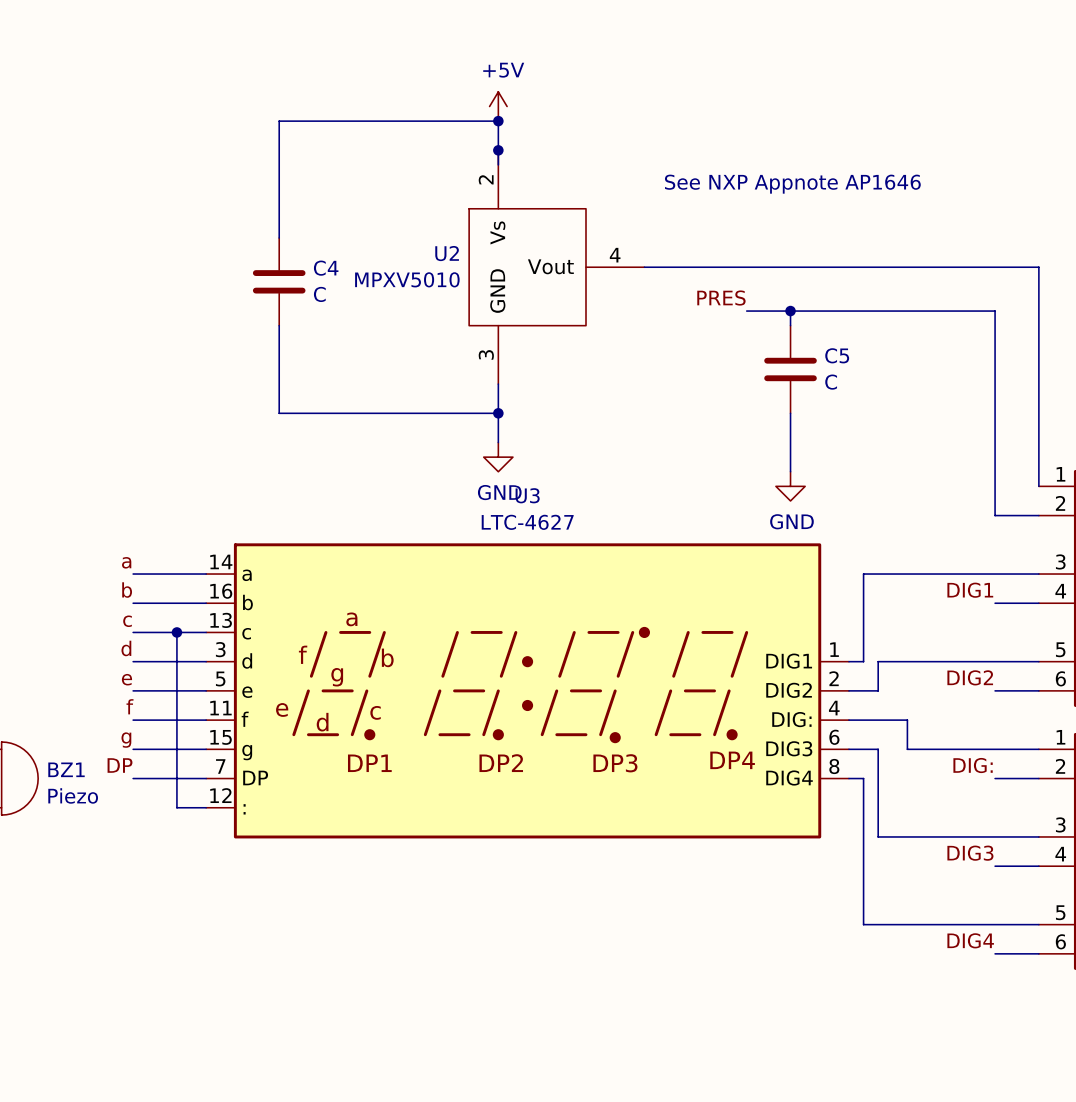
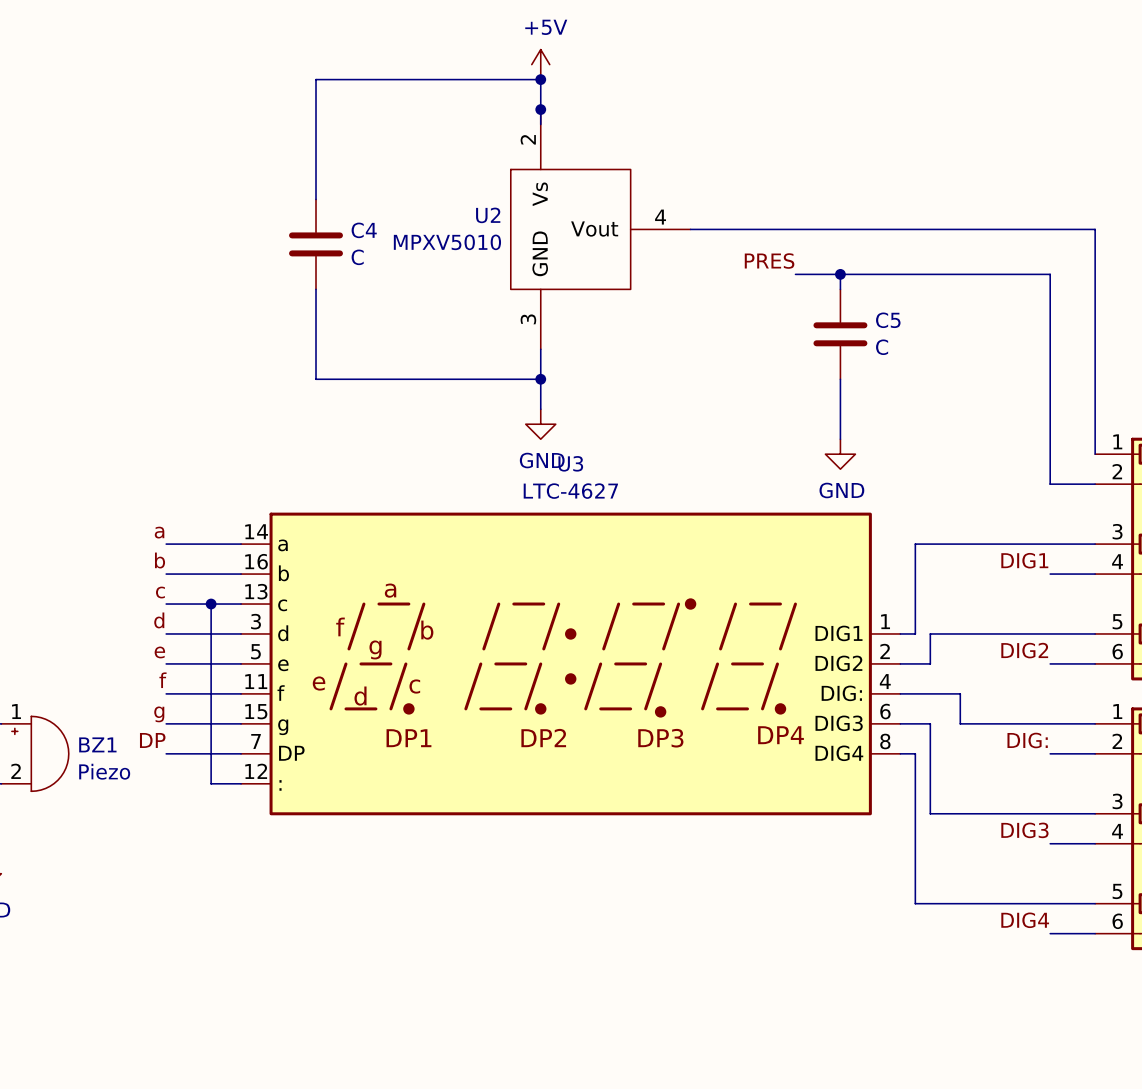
text: See NXP Appnote AP1646 (792, 184) -> none

